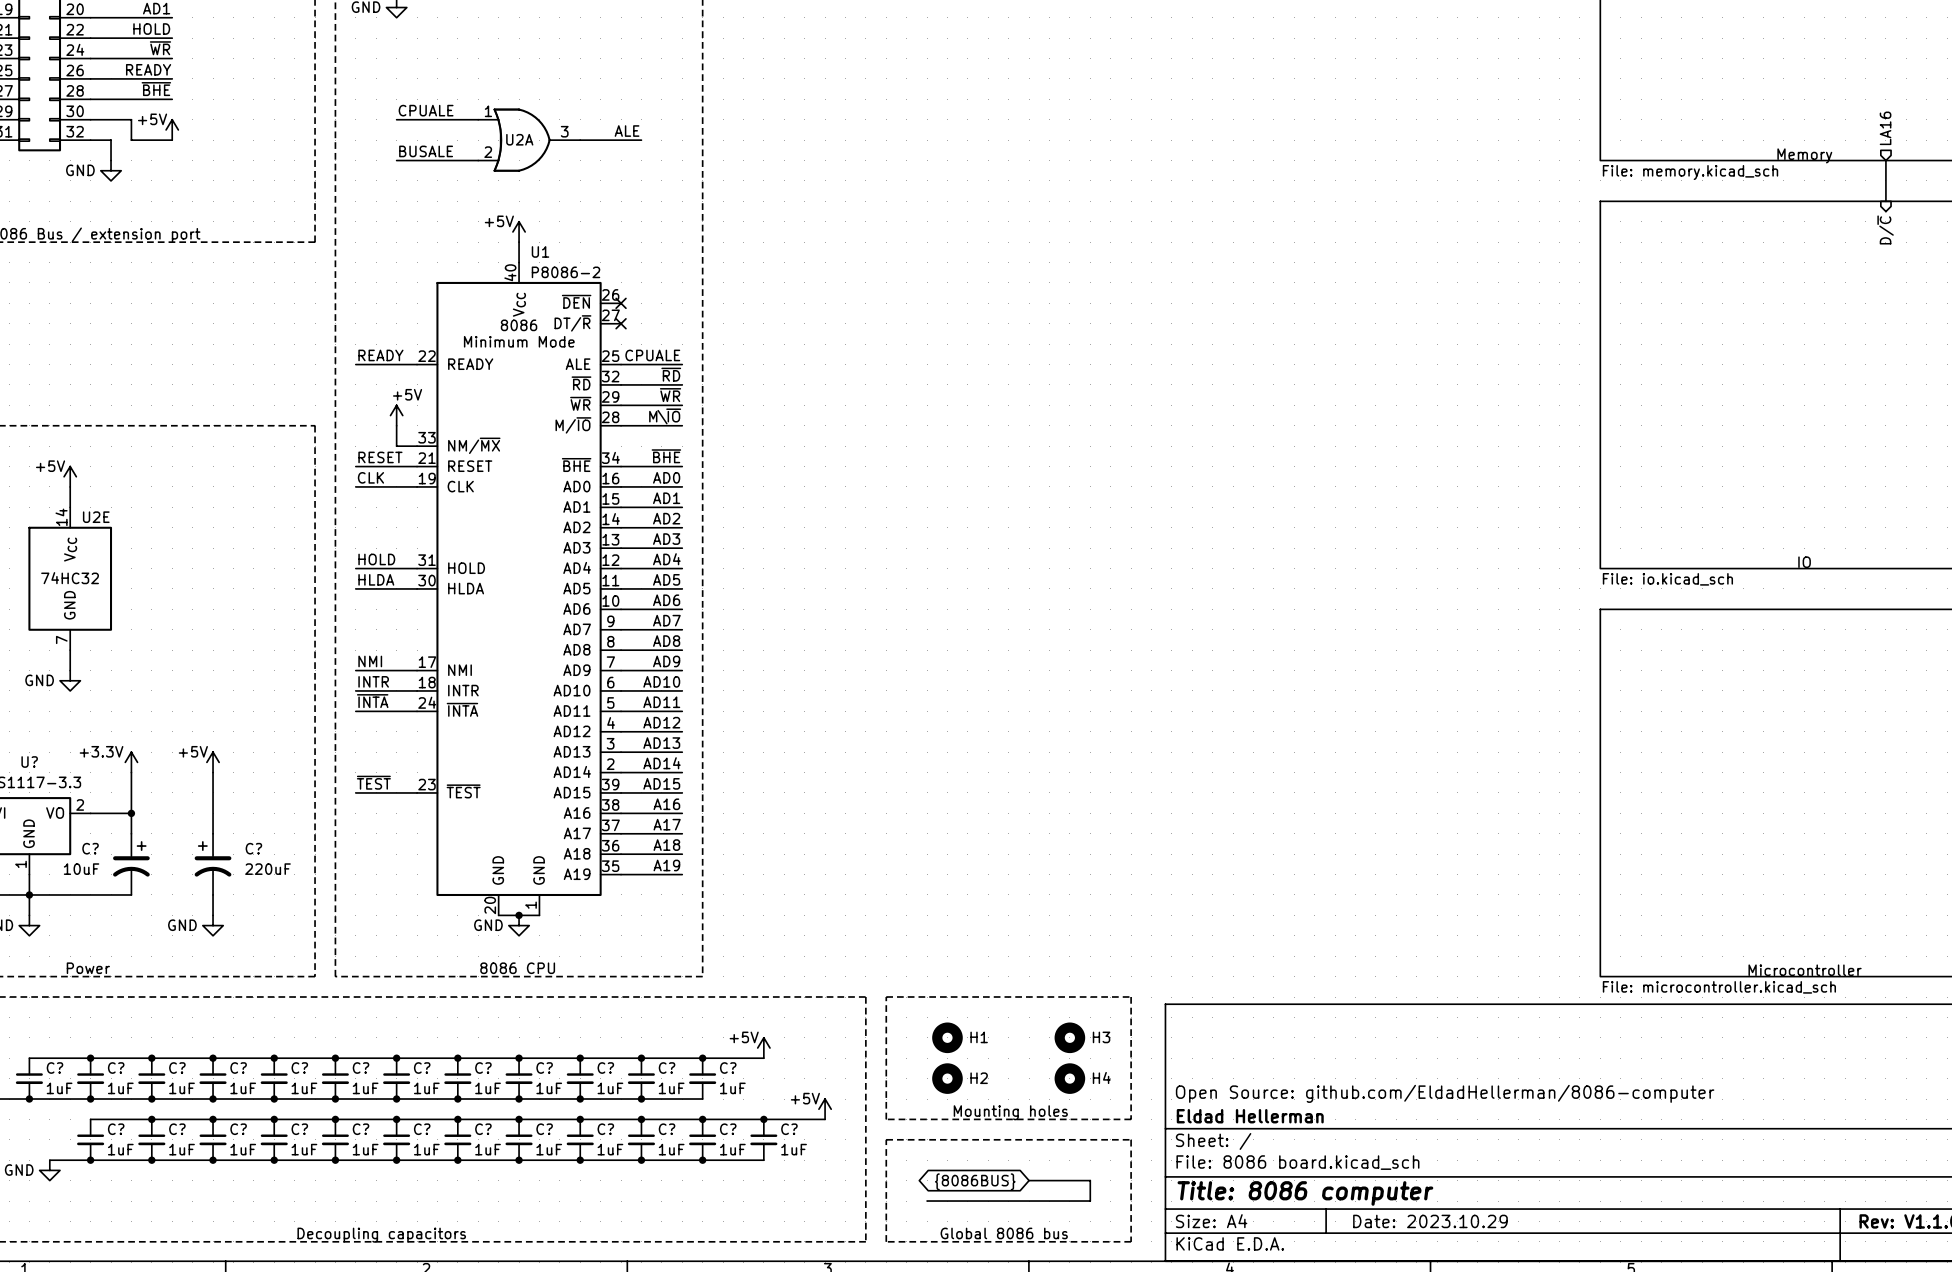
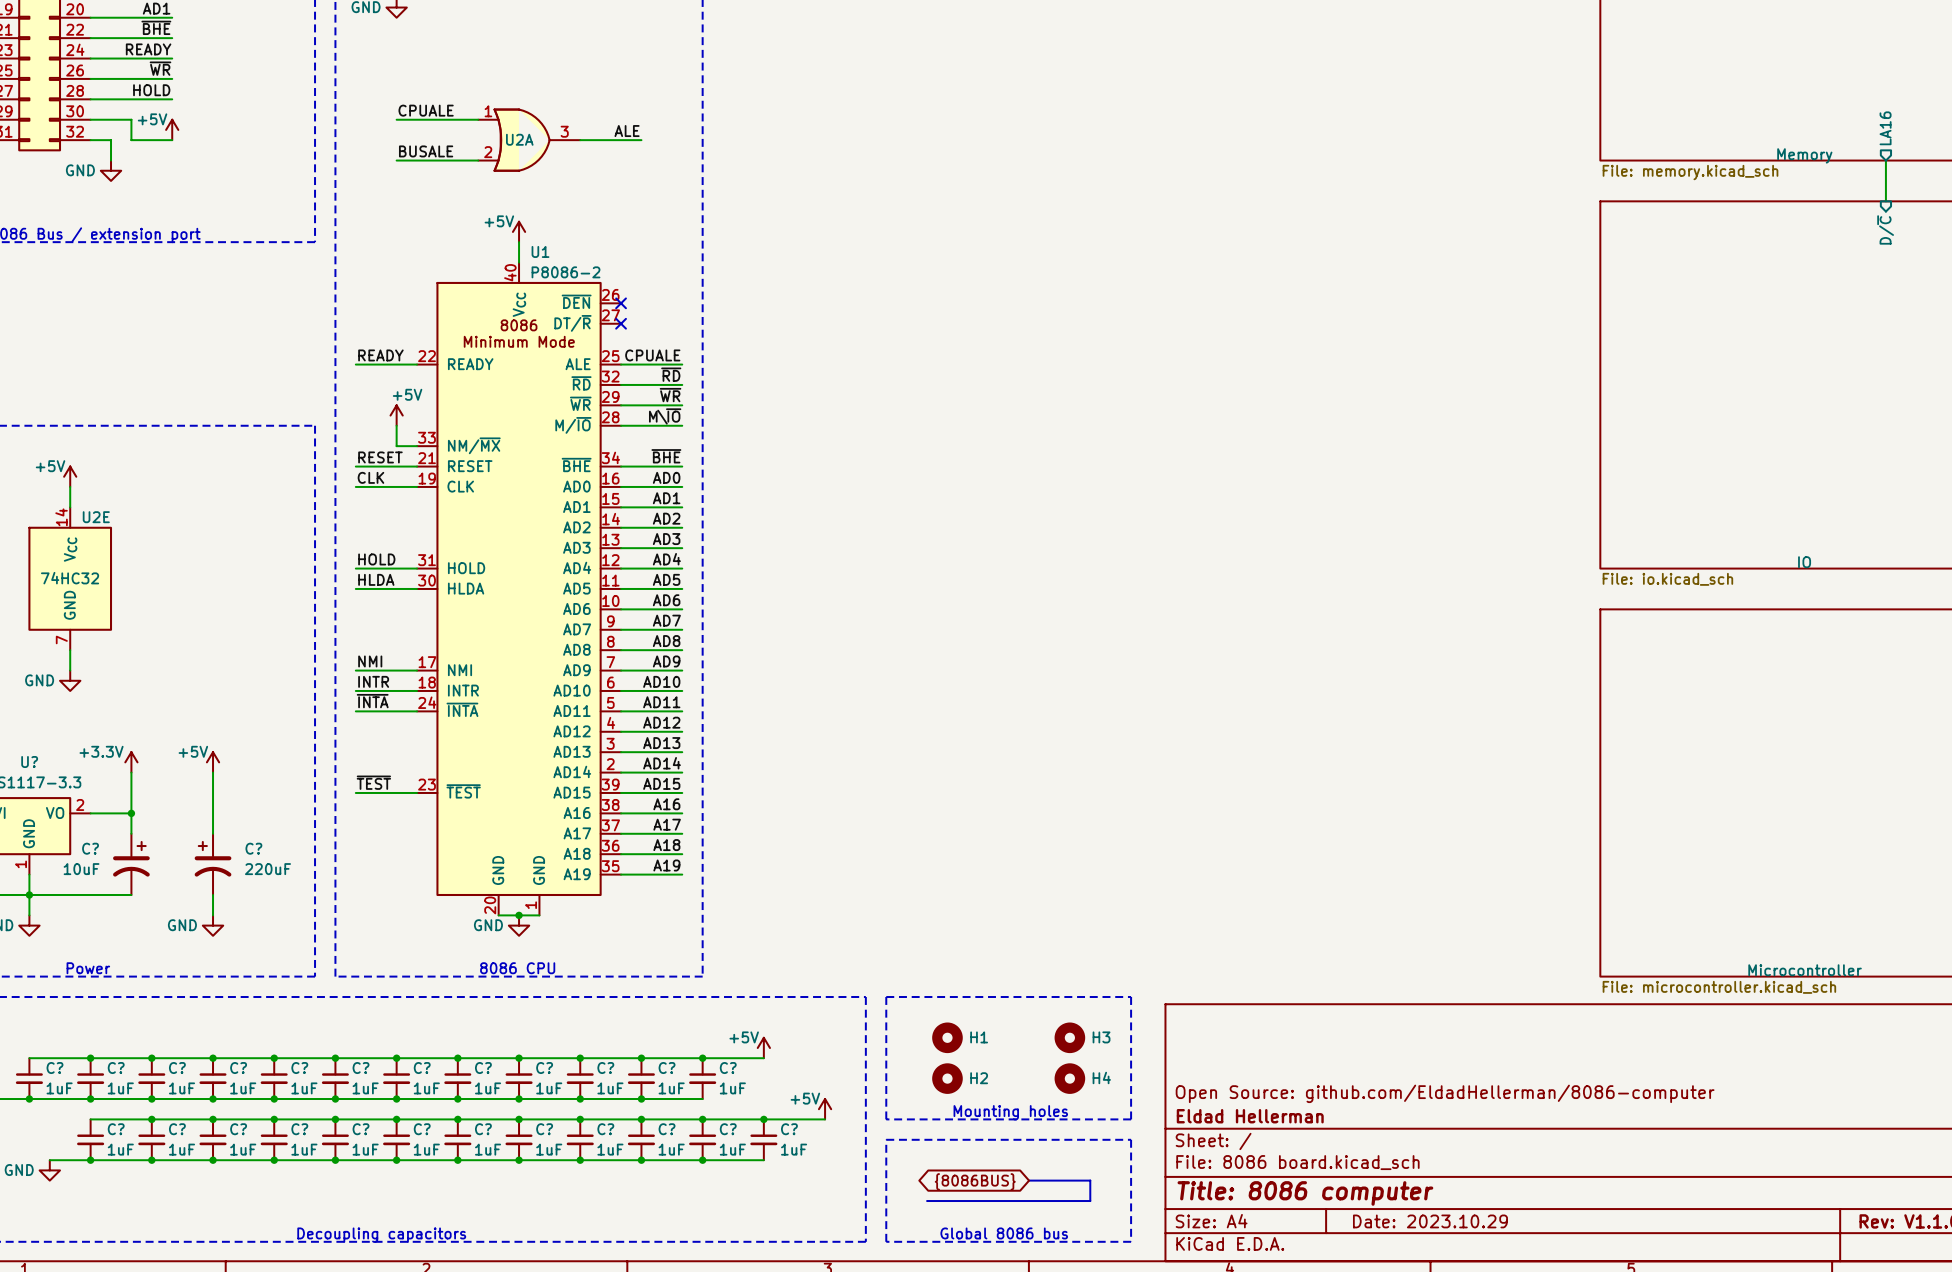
label: HOLD (151, 29) -> ~{BHE} (156, 27)
label: ~{WR} (160, 48) -> READY (148, 49)
label: READY (148, 69) -> ~{WR} (160, 68)
label: ~{BHE} (156, 89) -> HOLD (151, 90)

